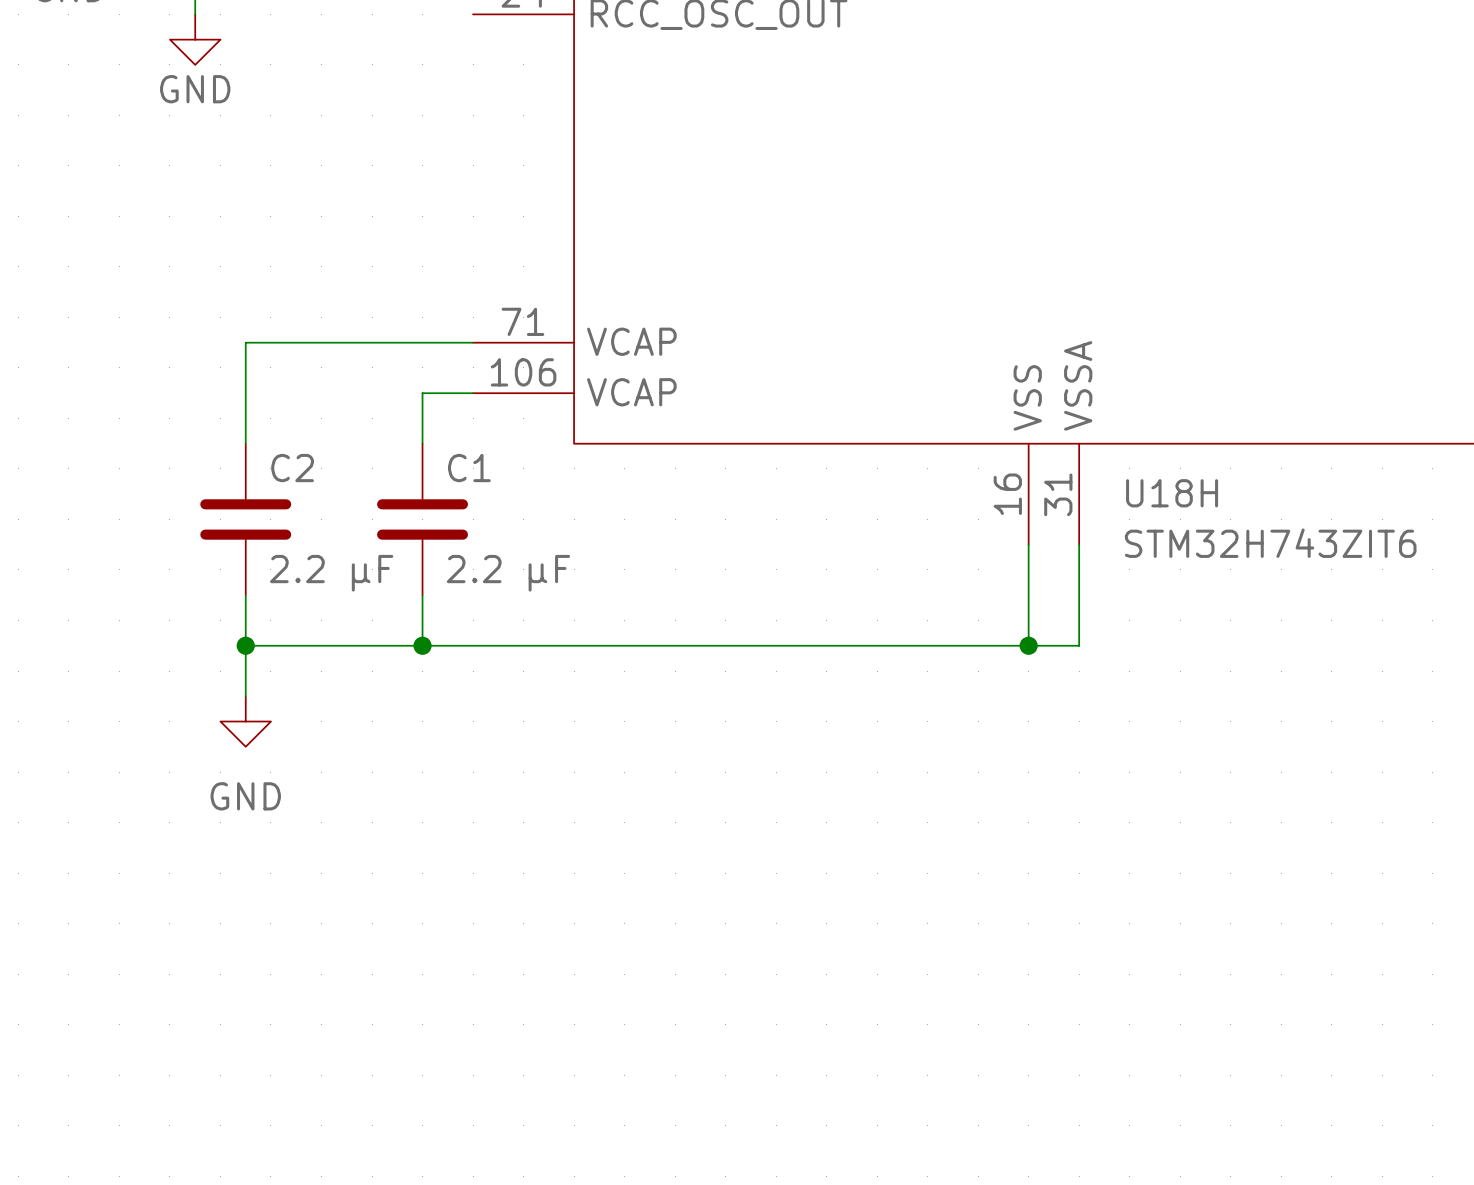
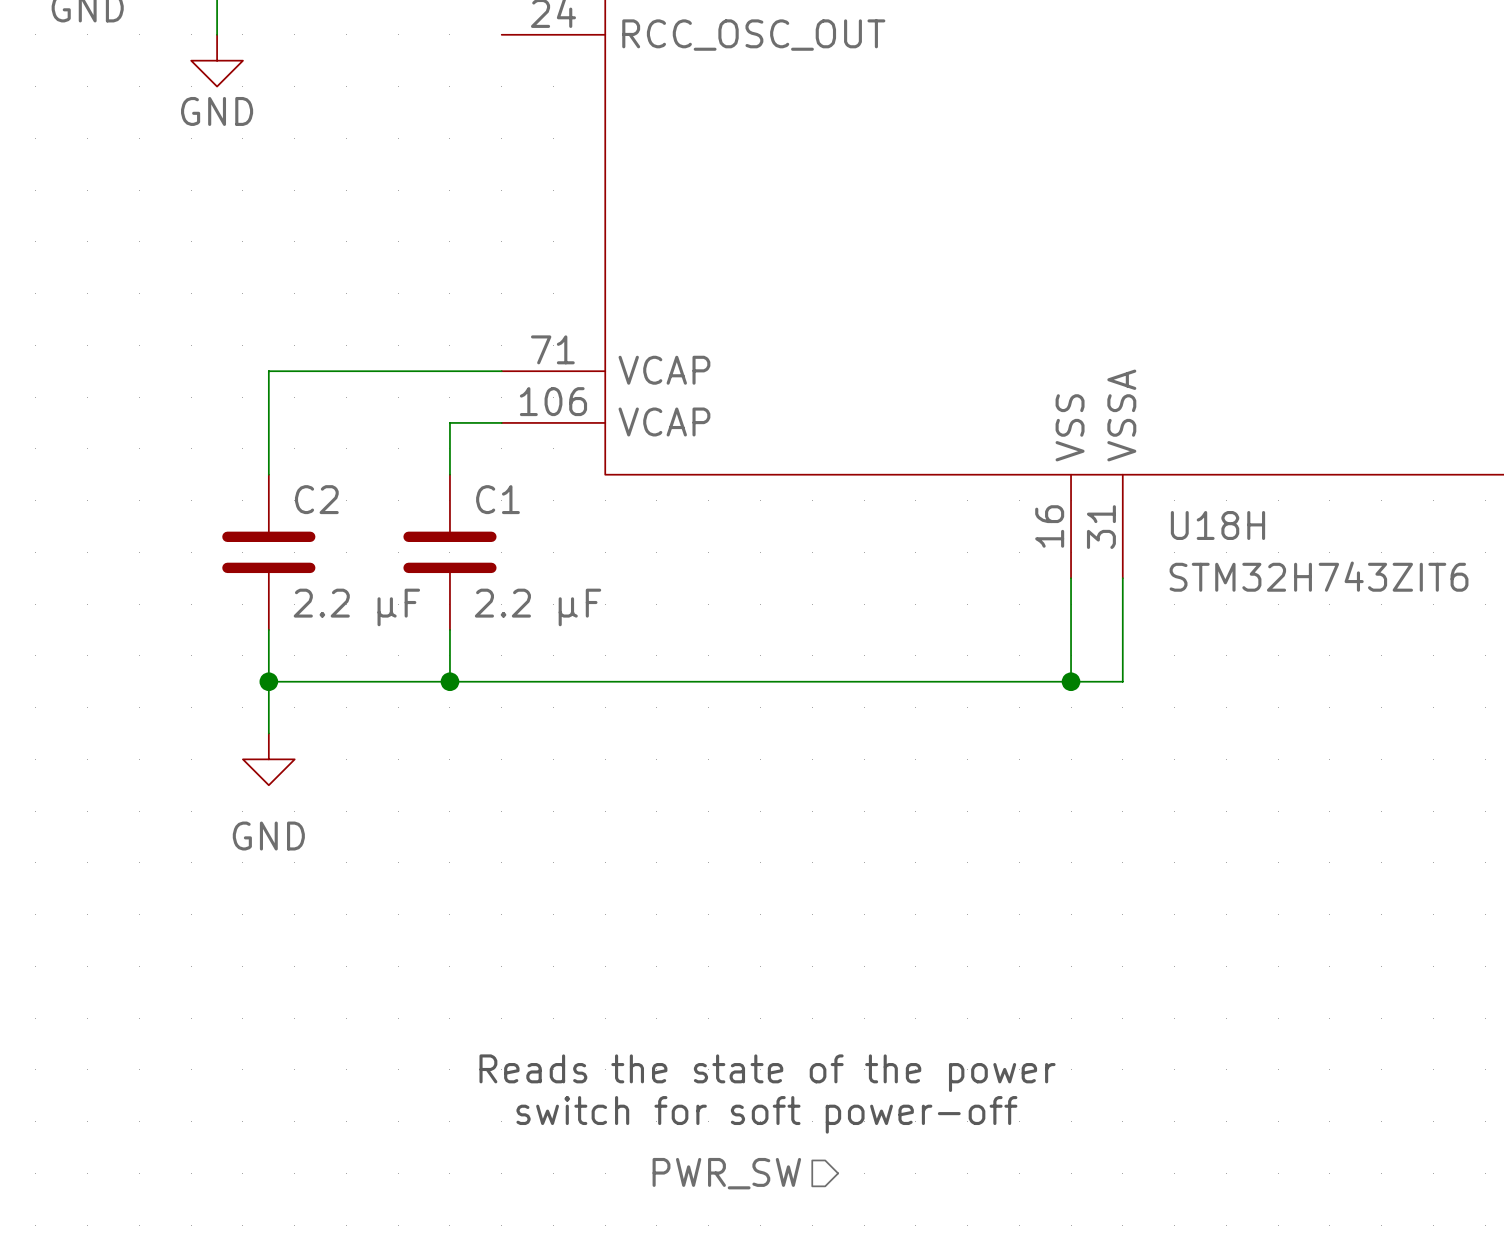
text: none -> Reads the state of the power (767, 1073)
text: none -> switch for soft power-off (766, 1114)
hierarchical label: none -> PWR_SW (726, 1173)

